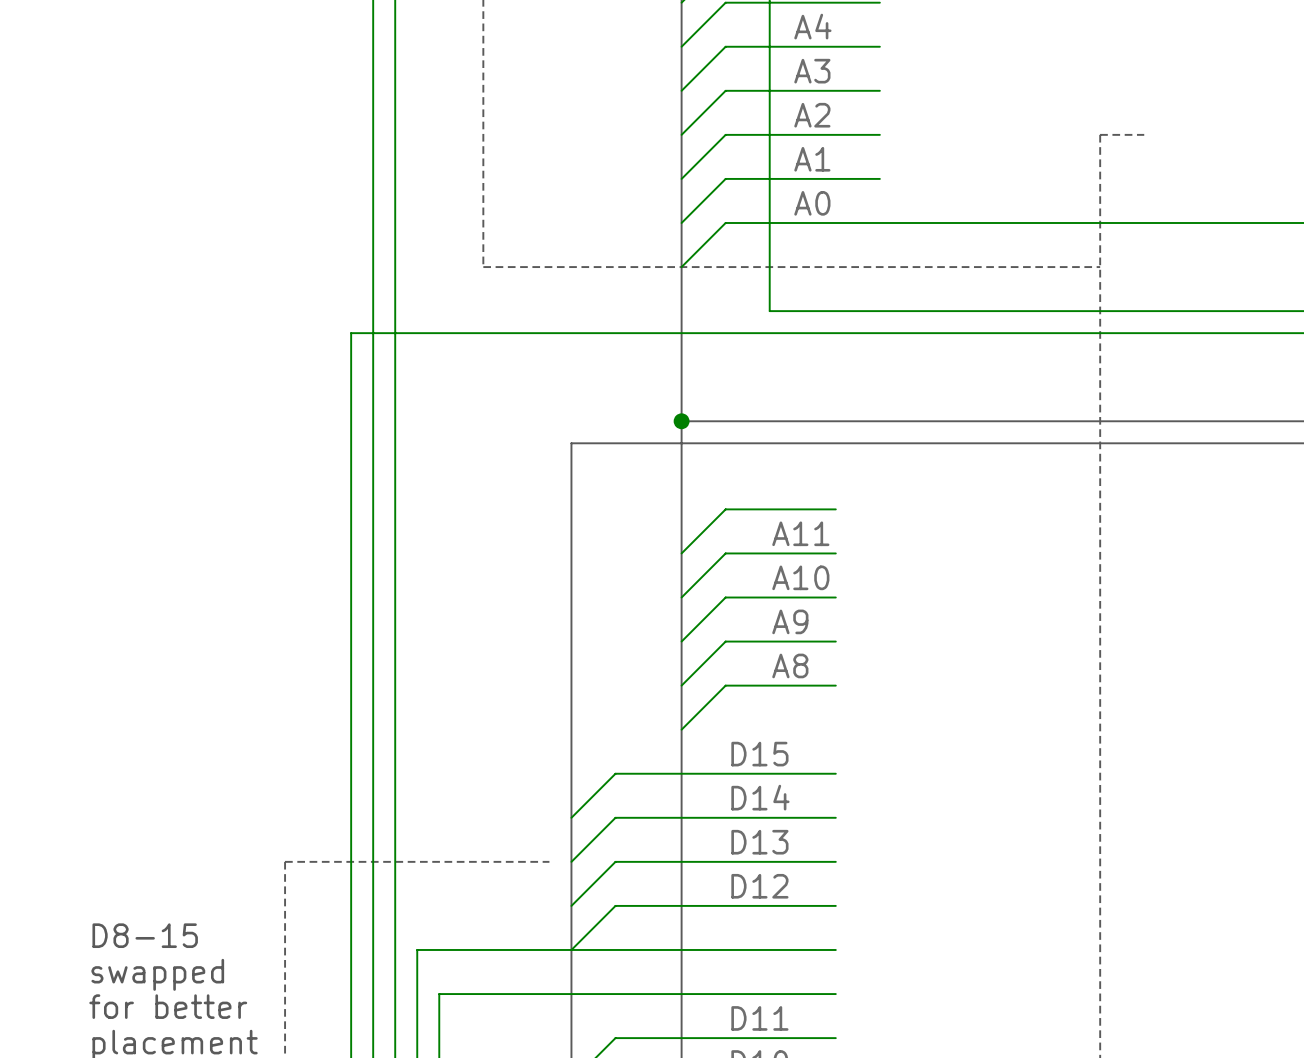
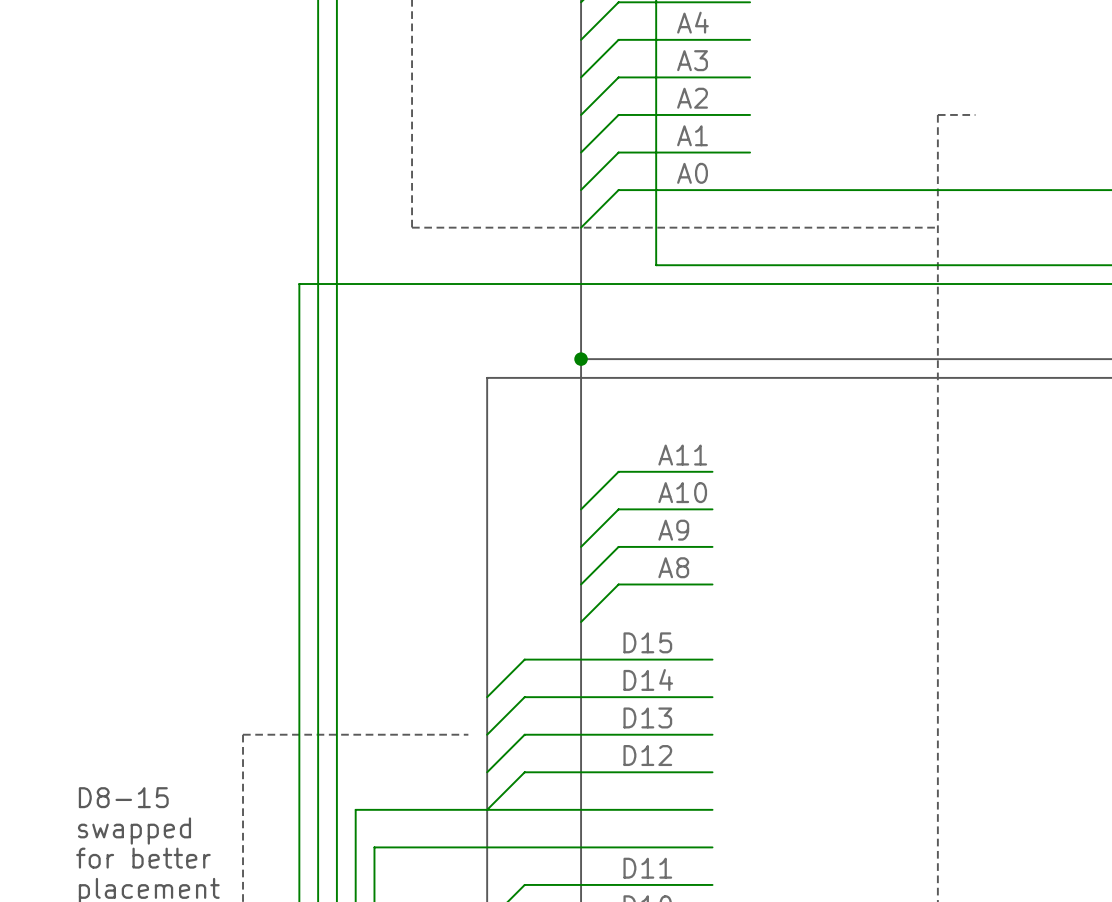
wire: (835, 509) (725, 509) (681, 553) -> none

